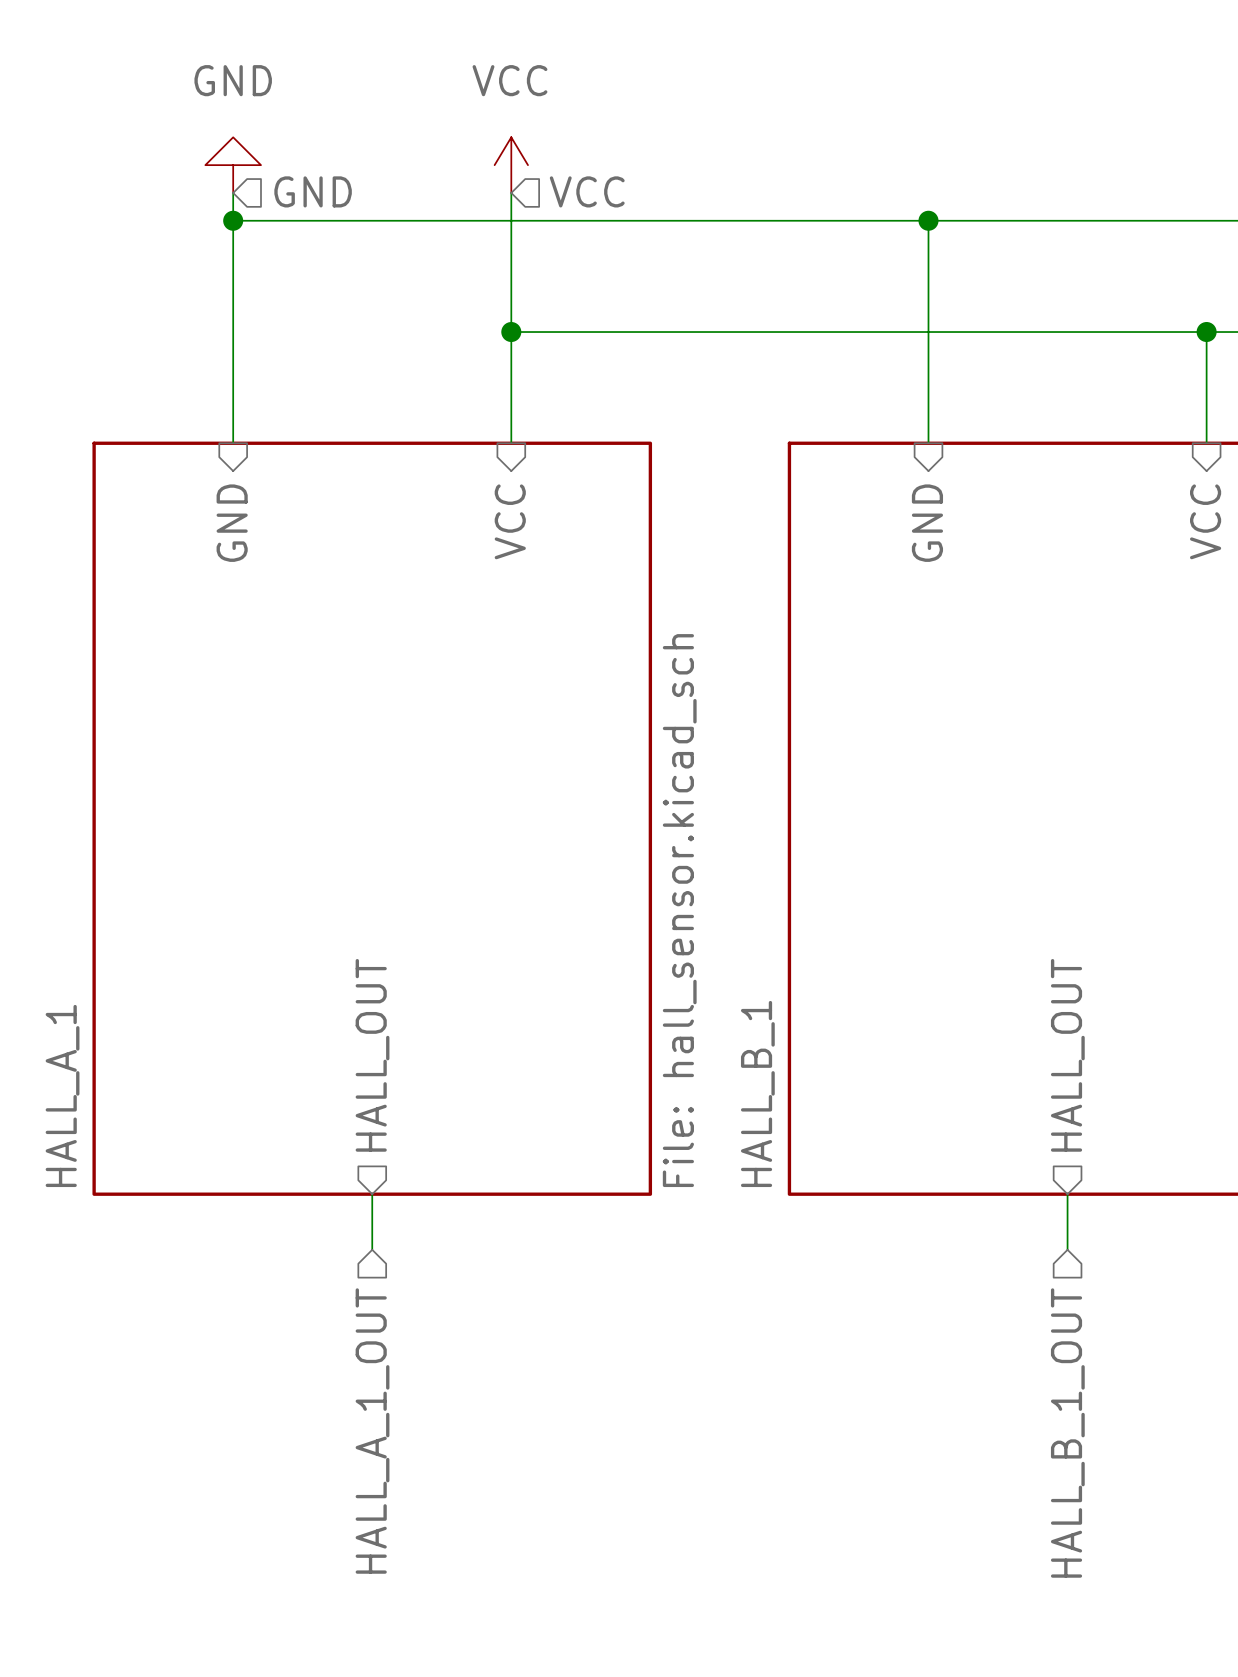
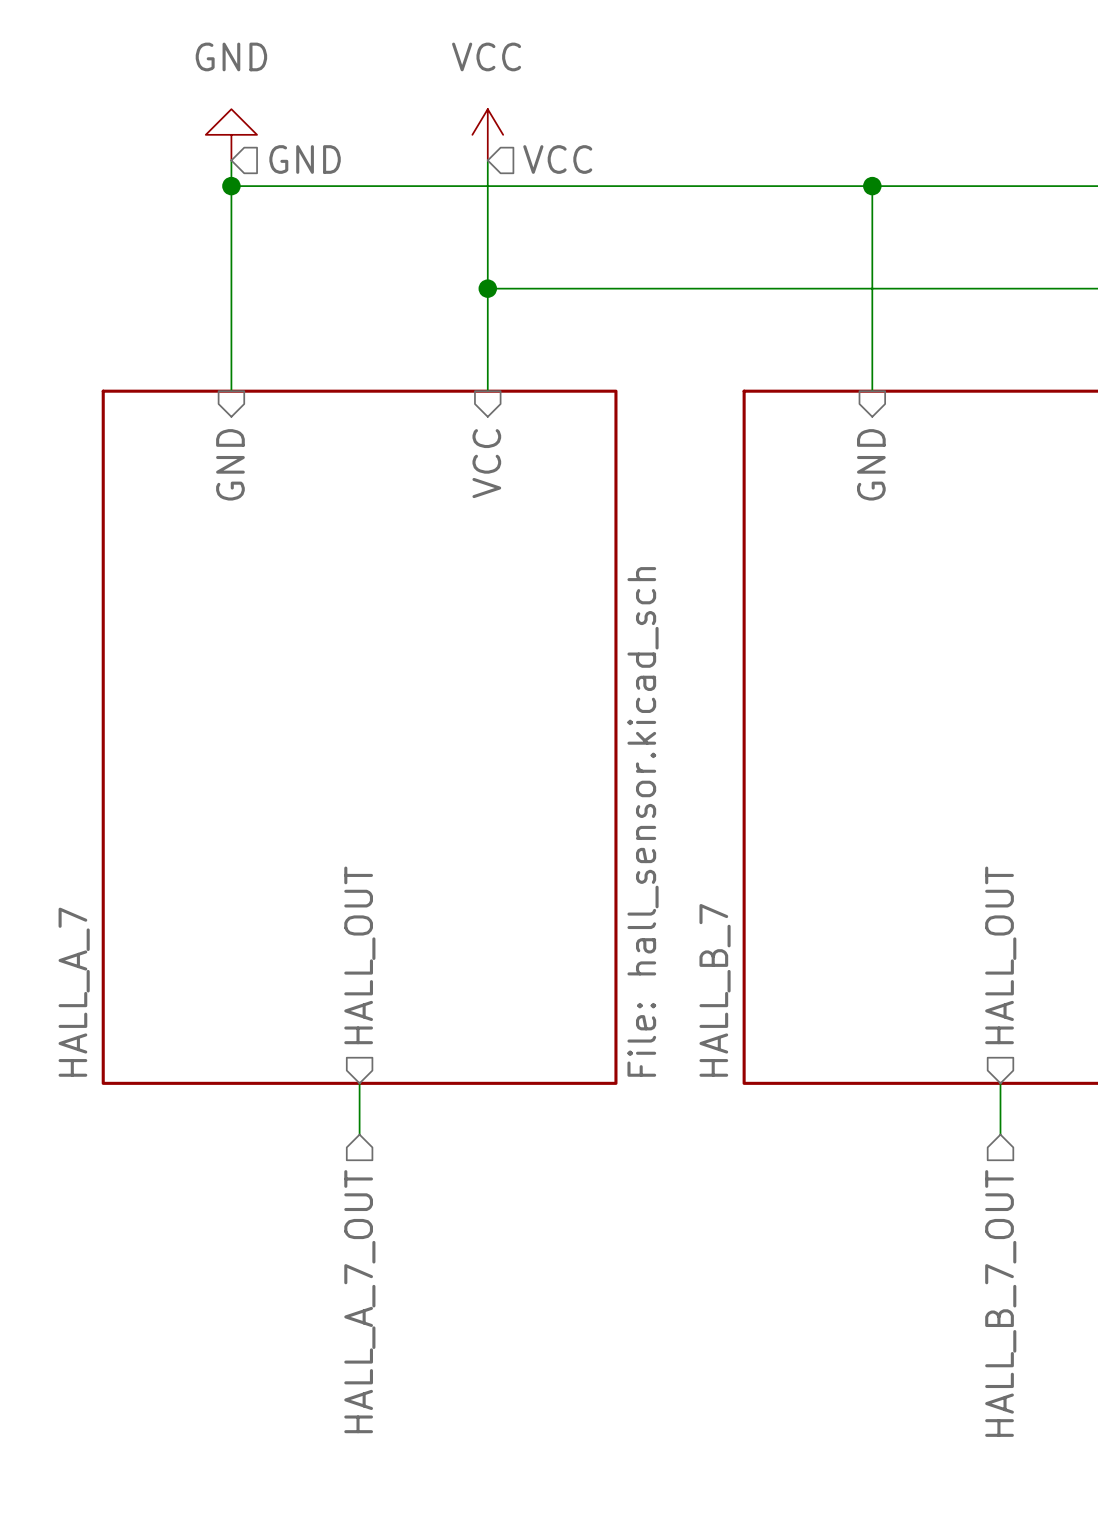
sheet HALL_B_1 name: HALL_B_1 (757, 1093) -> HALL_B_7 (715, 990)
sheet HALL_A_1 name: HALL_A_1 (62, 1095) -> HALL_A_7 (74, 992)
hierarchical label: HALL_A_1_OUT (372, 1431) -> HALL_A_7_OUT (359, 1301)
hierarchical label: HALL_B_1_OUT (1067, 1433) -> HALL_B_7_OUT (1000, 1303)

